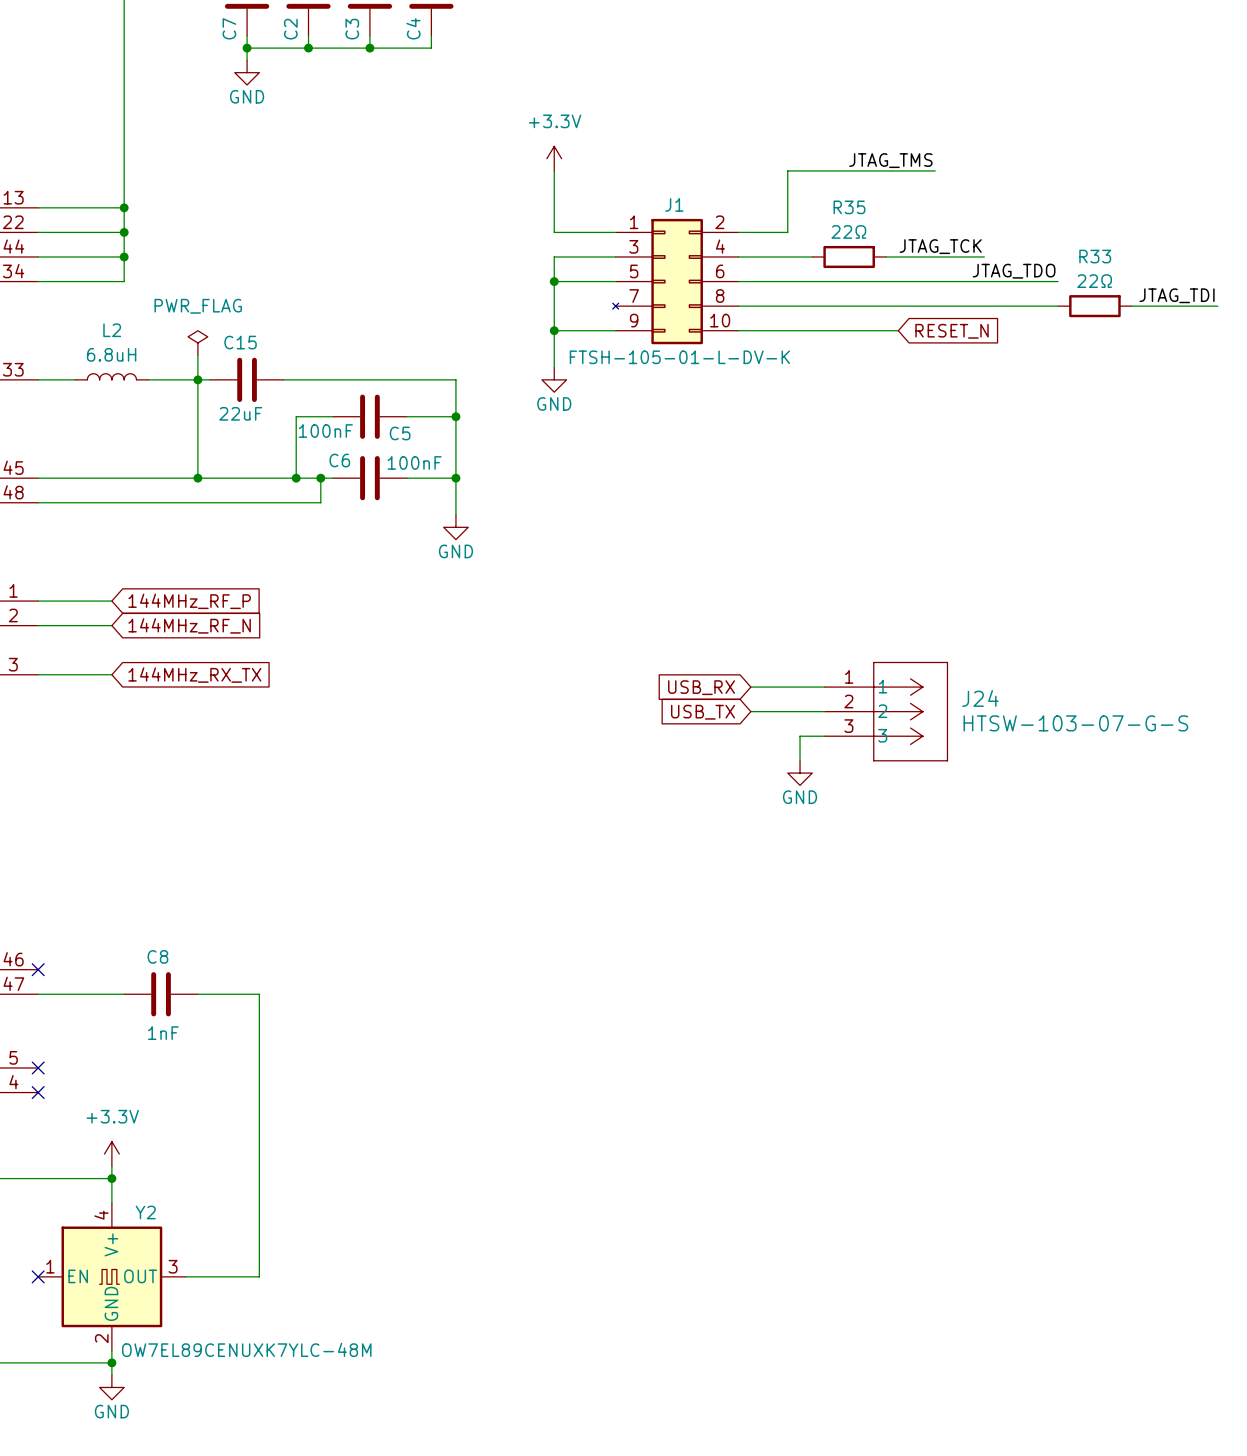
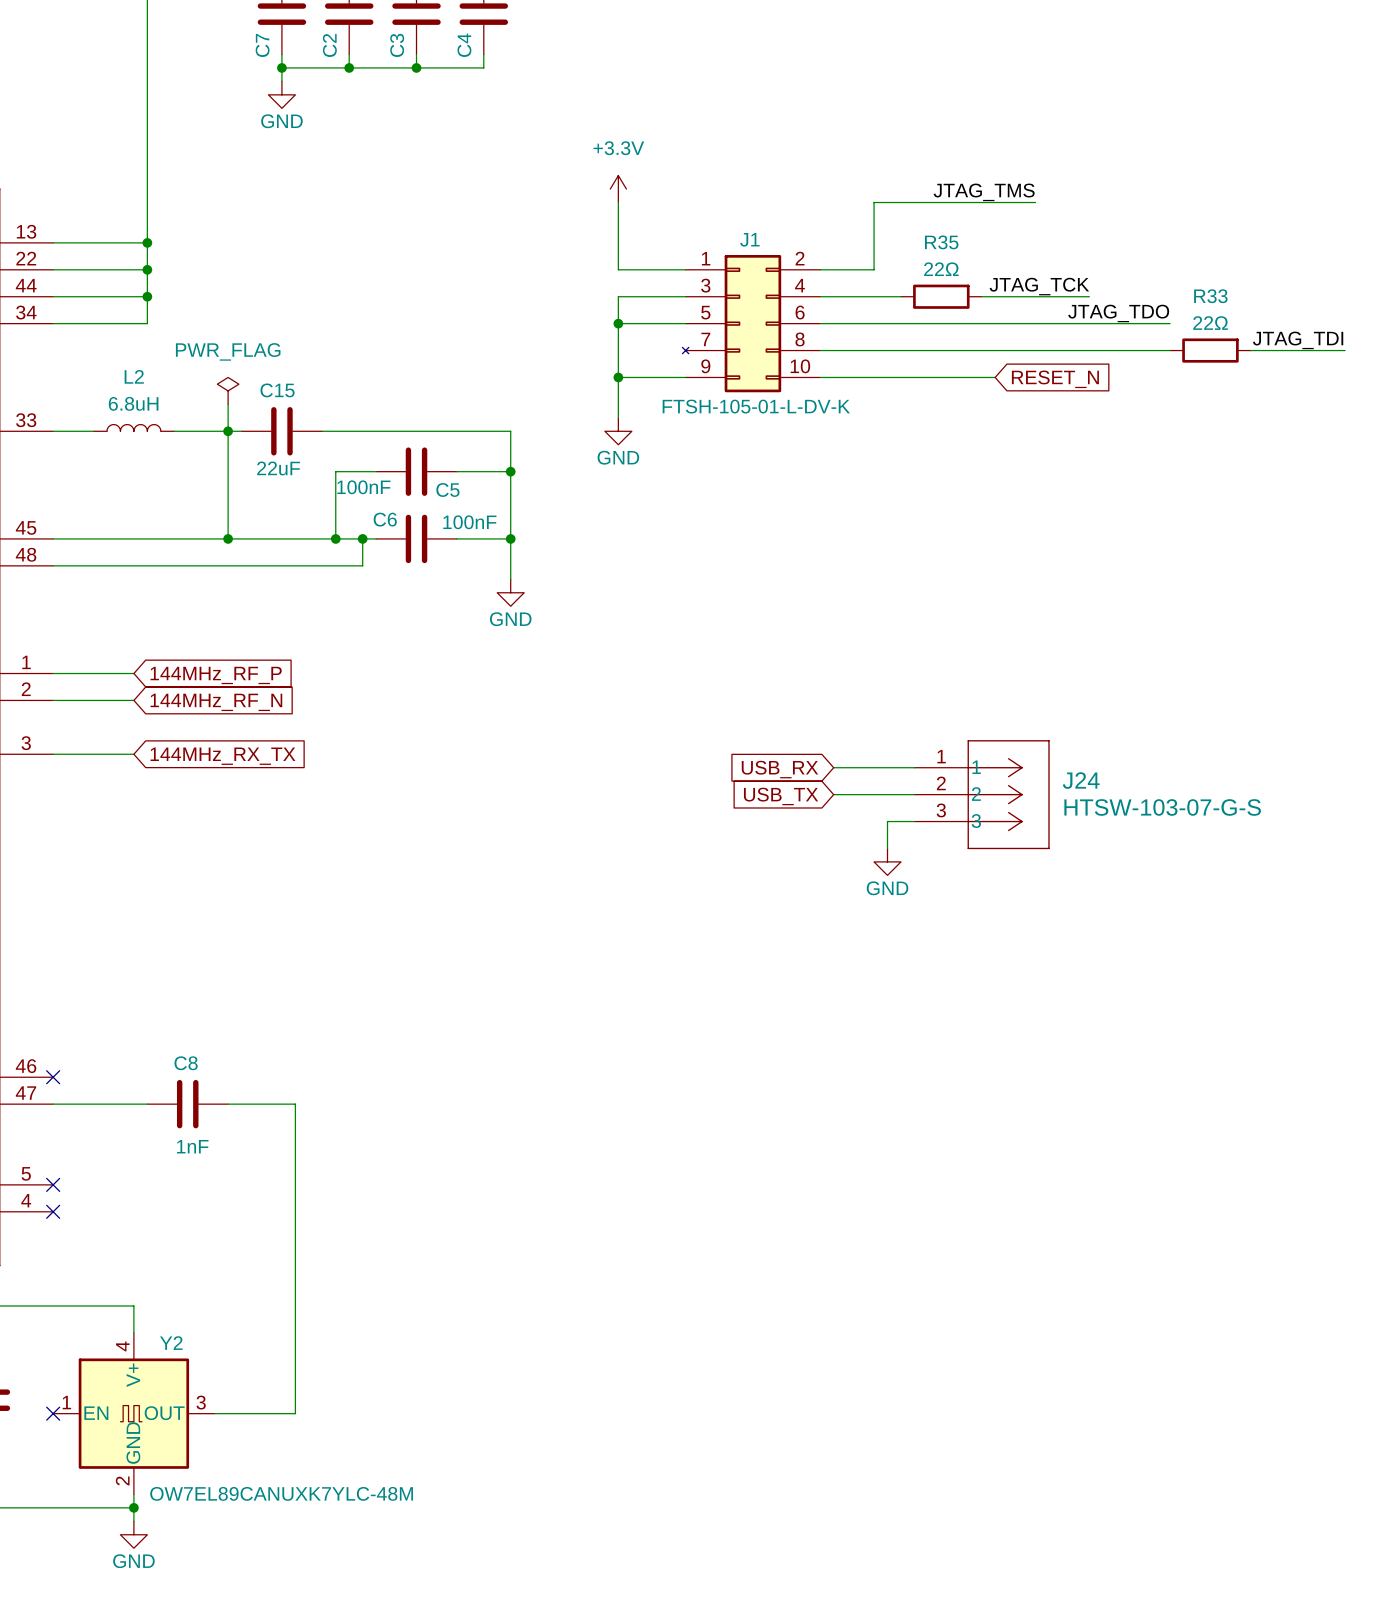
power symbol: +3.3V (111, 1154) -> none
wire: (111, 1166) (111, 1178) -> none
junction: (111, 1178) -> none
Y2 value: OW7EL89CENUXK7YLC-48M (246, 1349) -> OW7EL89CANUXK7YLC-48M (281, 1493)

